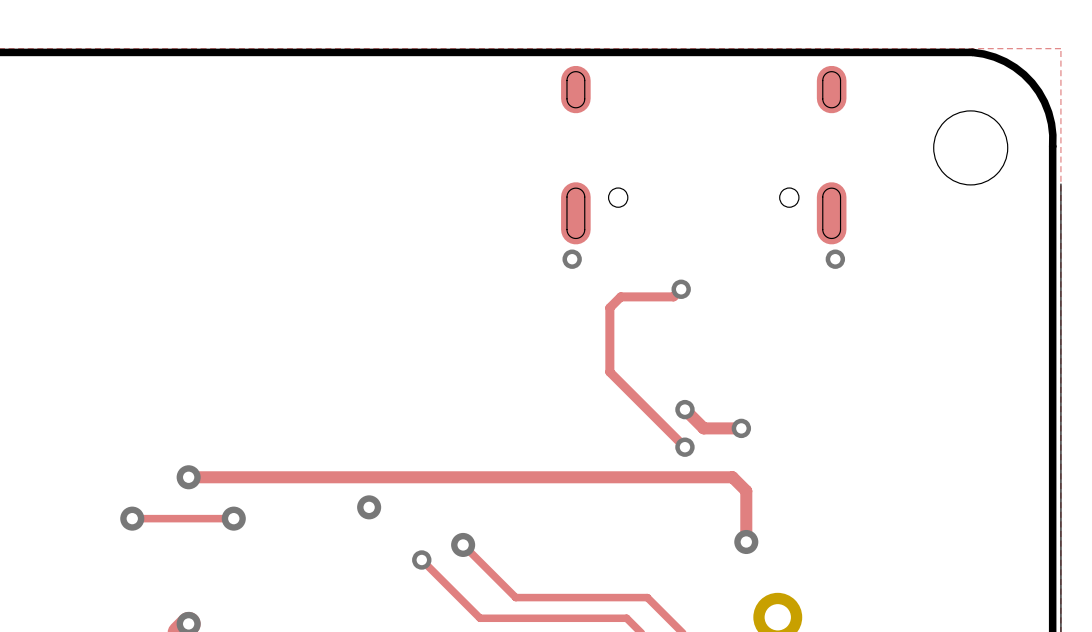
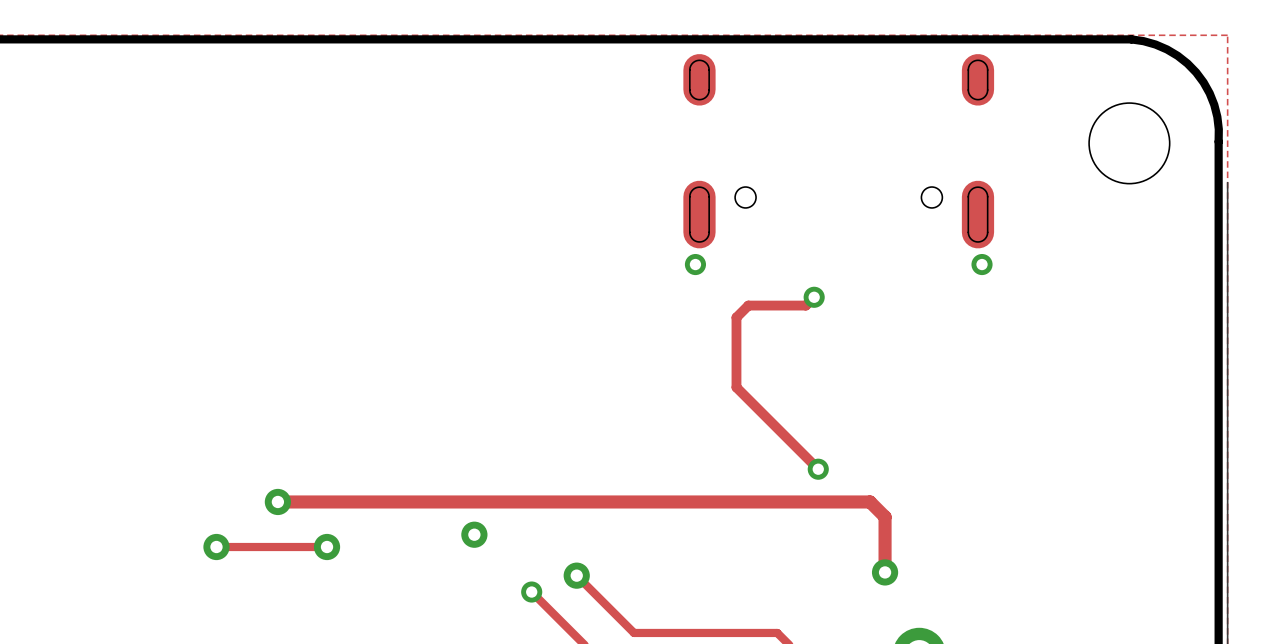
track: (684, 409) (703, 428) (741, 428) -> none
via: (684, 409) -> none
via: (741, 428) -> none

